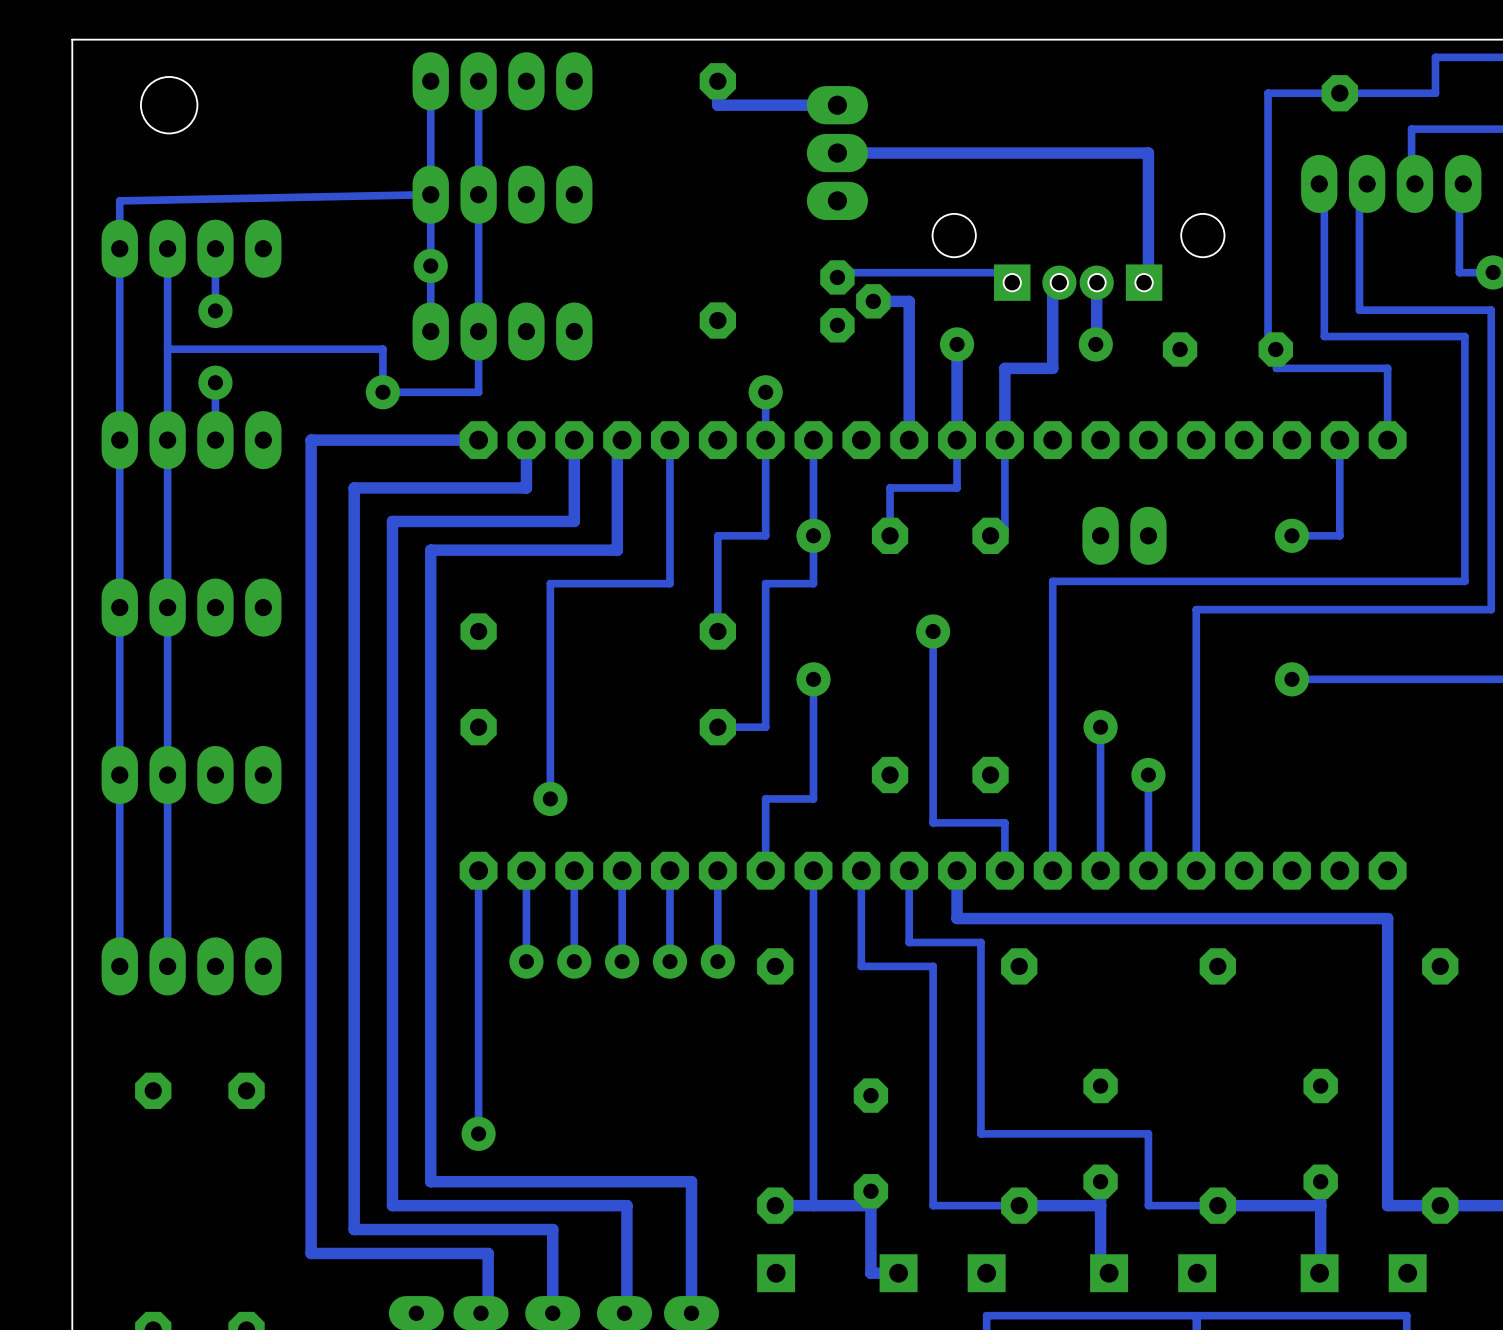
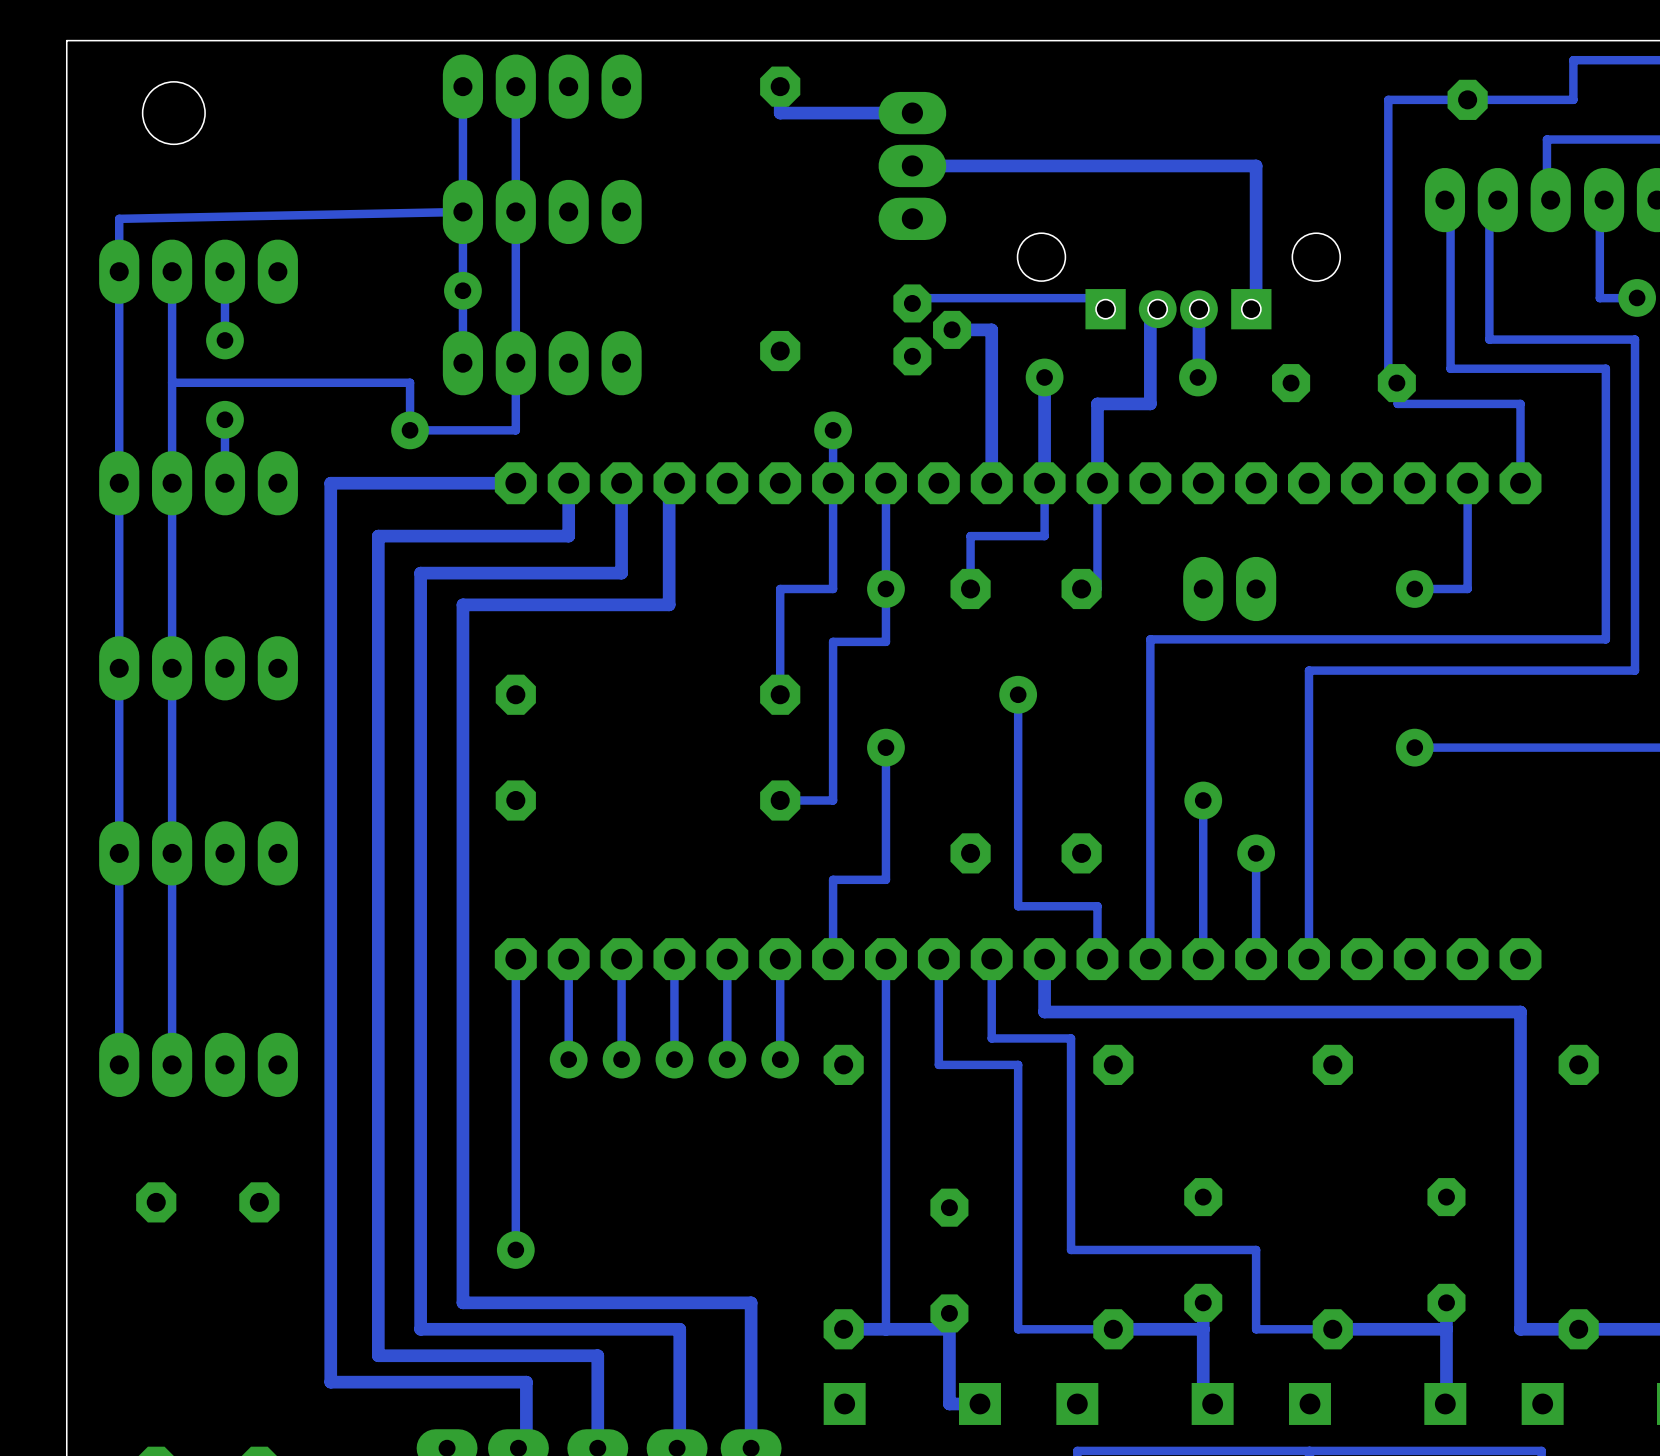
track: (669, 440) (669, 583) (550, 583) (550, 798) -> none
via: (550, 798) -> none

